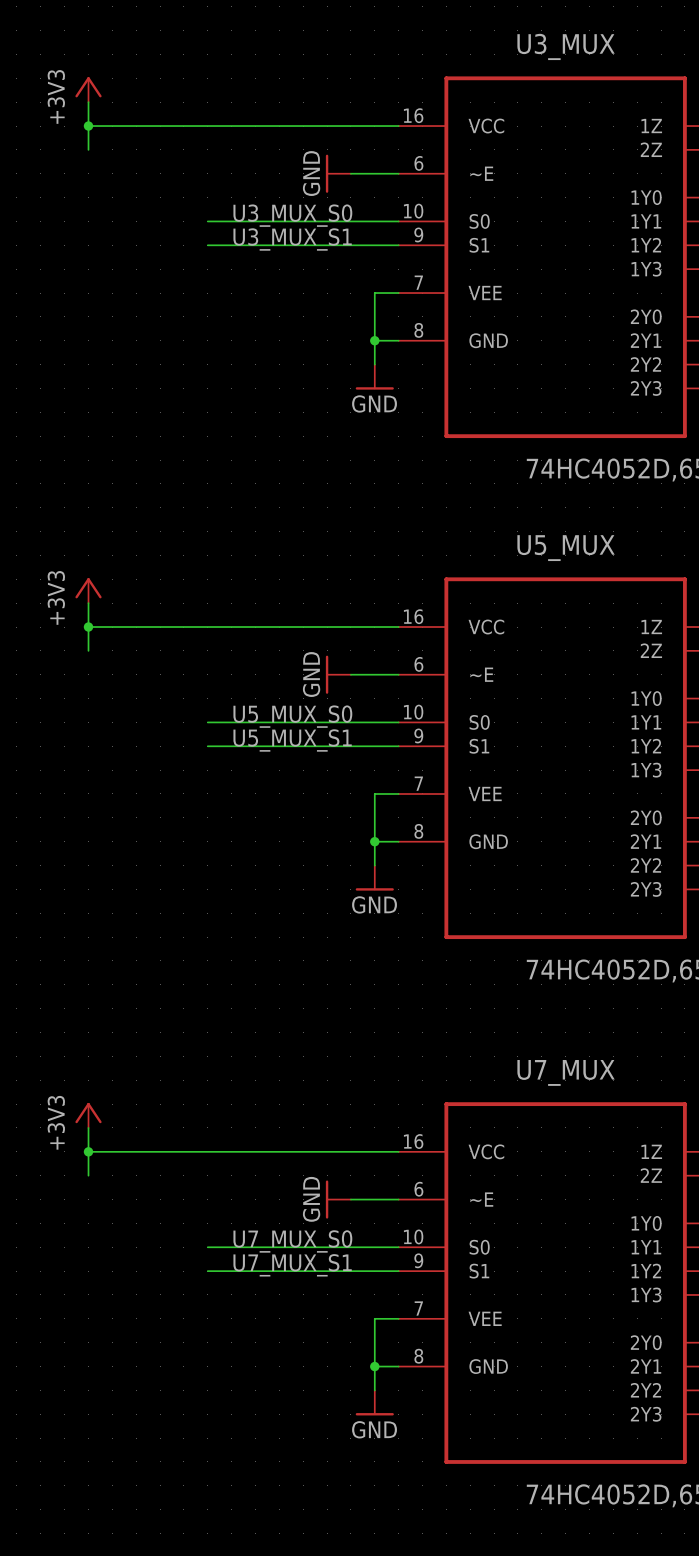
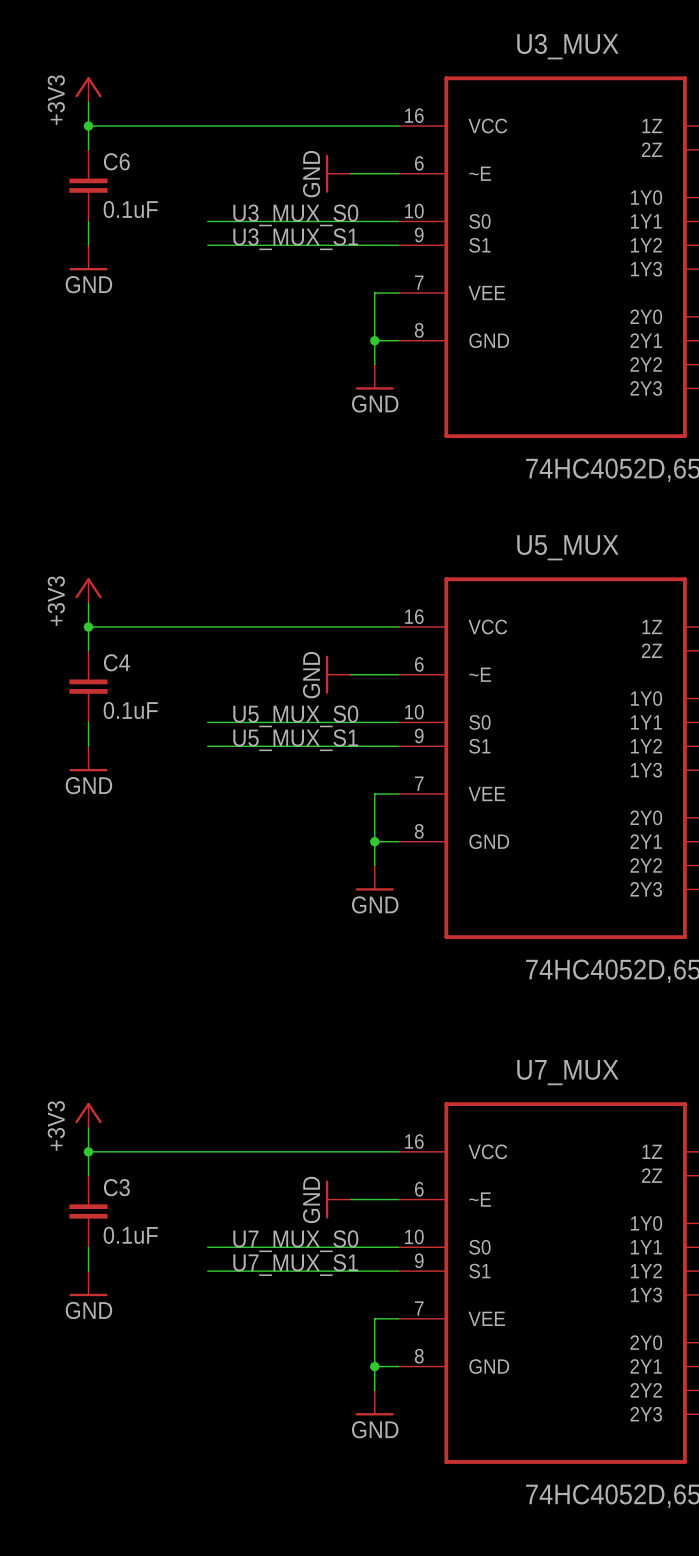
C6: none -> 0.1uF (88, 185)
wire: none -> (88, 221) (88, 245)
power symbol: none -> GND (88, 257)
C4: none -> 0.1uF (88, 686)
wire: none -> (88, 722) (88, 746)
power symbol: none -> GND (88, 758)
C3: none -> 0.1uF (88, 1211)
wire: none -> (88, 1247) (88, 1271)
power symbol: none -> GND (88, 1283)

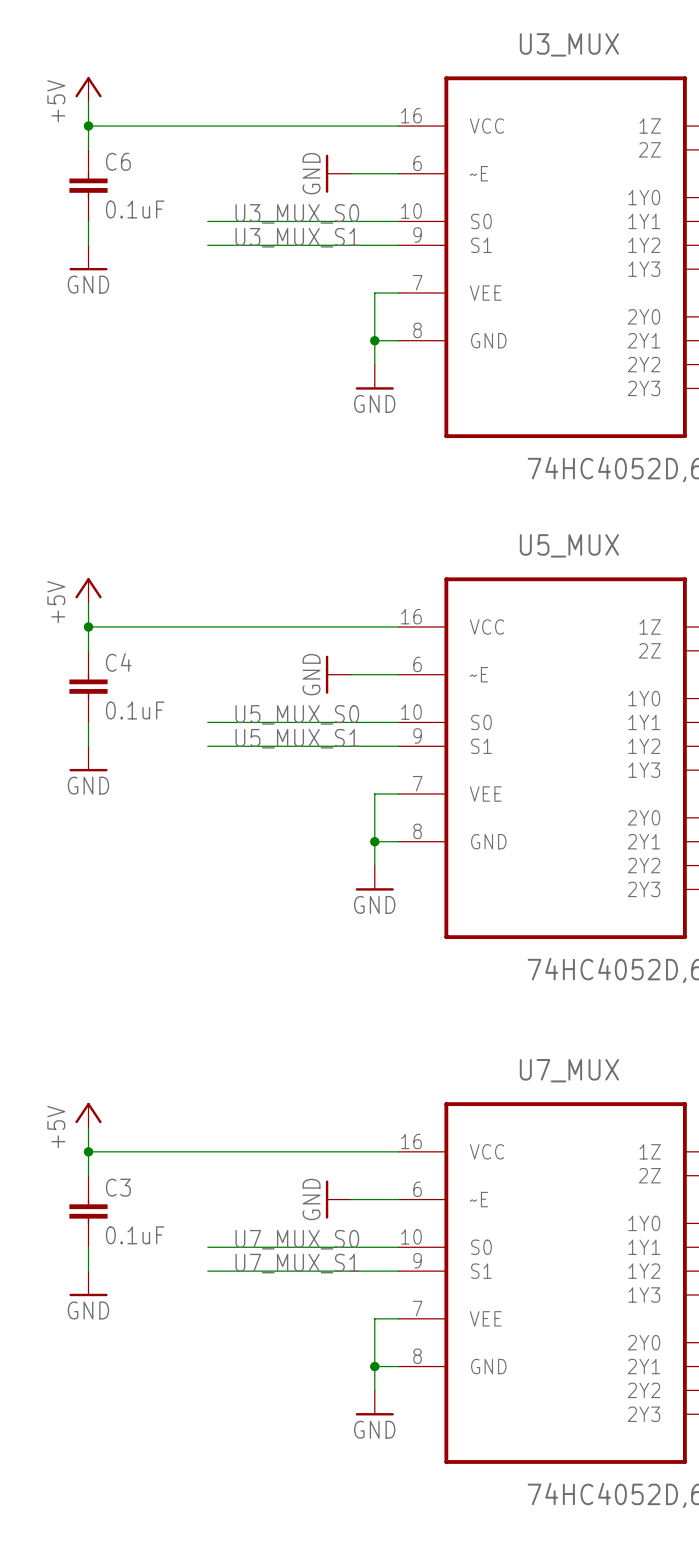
power symbol: +3V3 (88, 89) -> +5V (88, 89)
power symbol: +3V3 (88, 590) -> +5V (88, 590)
power symbol: +3V3 (88, 1115) -> +5V (88, 1115)

